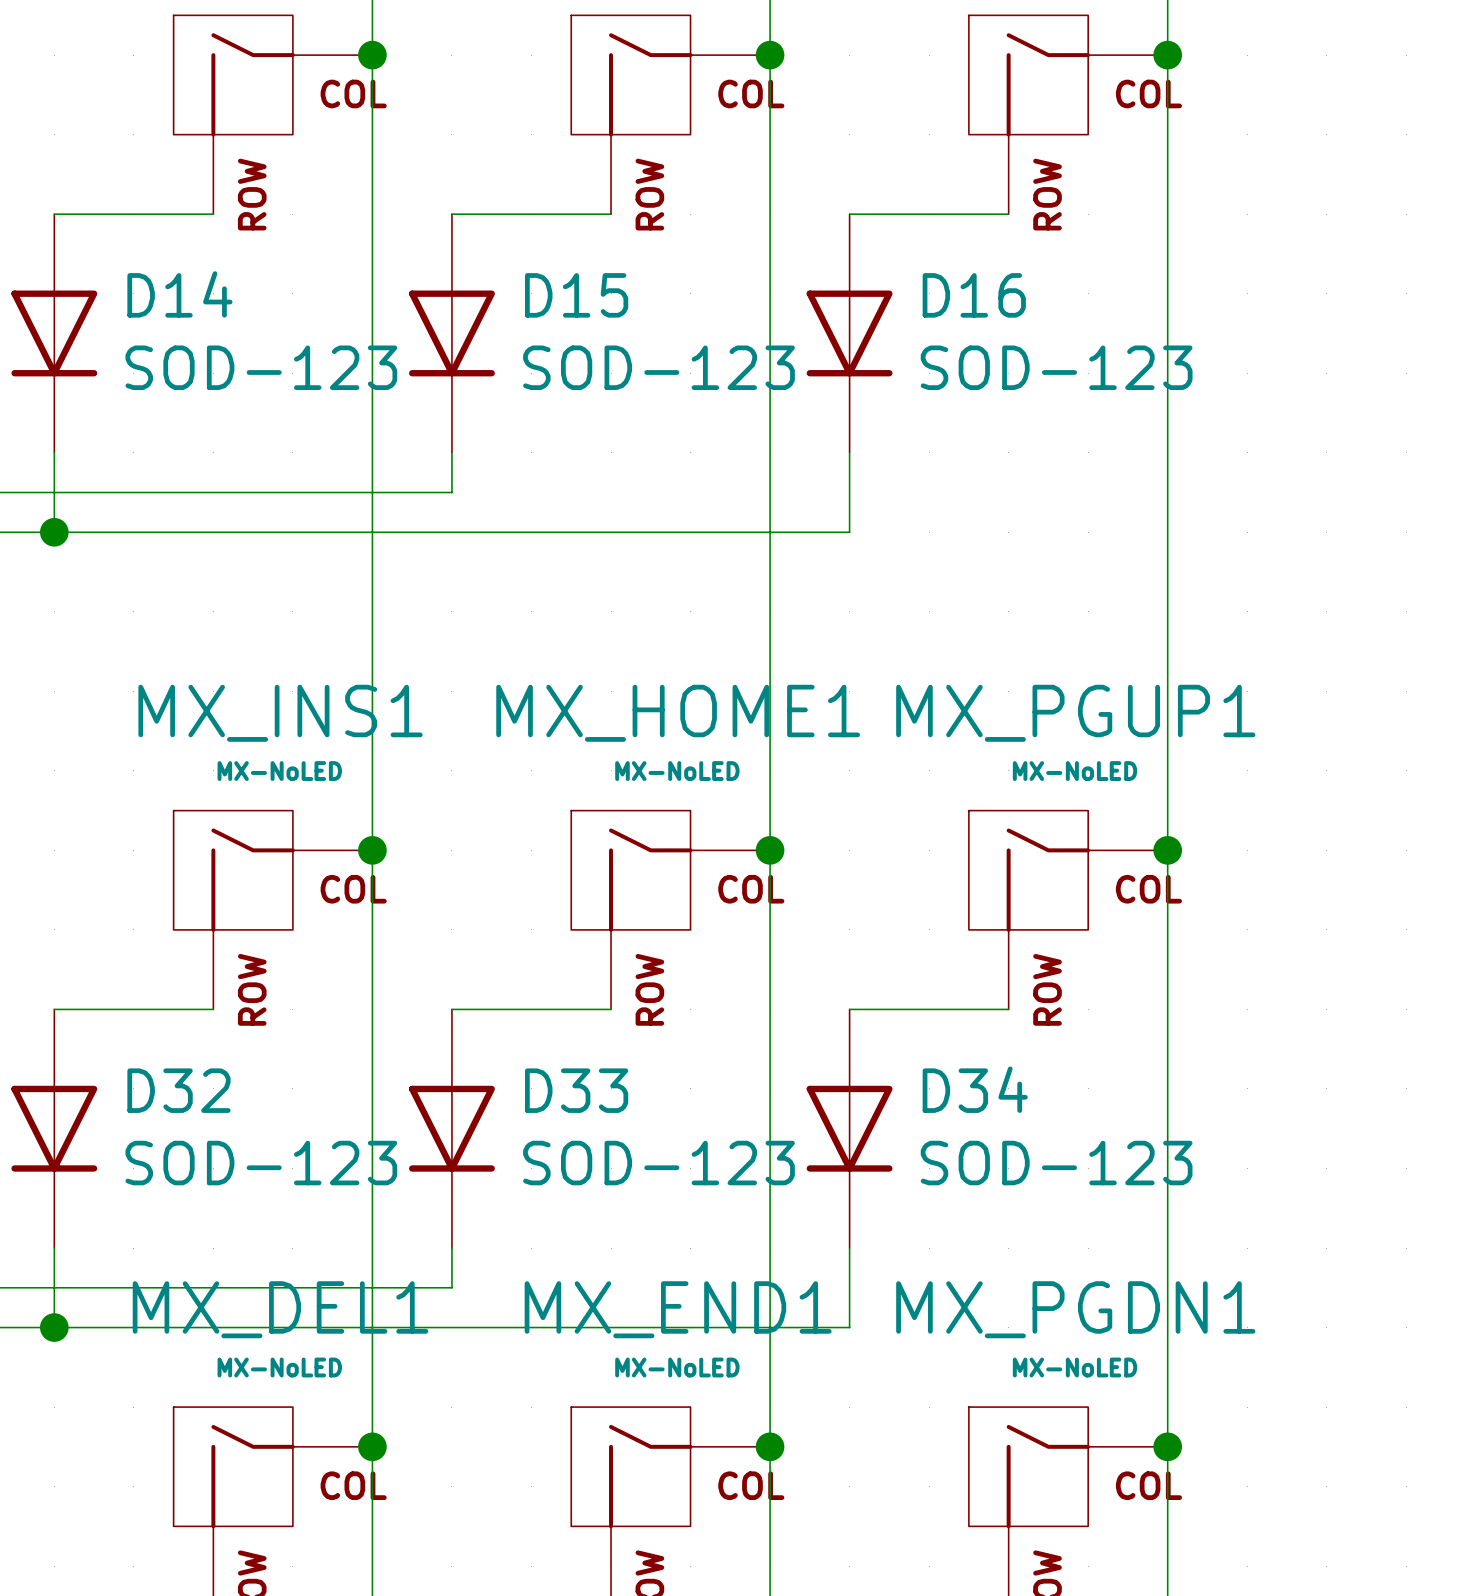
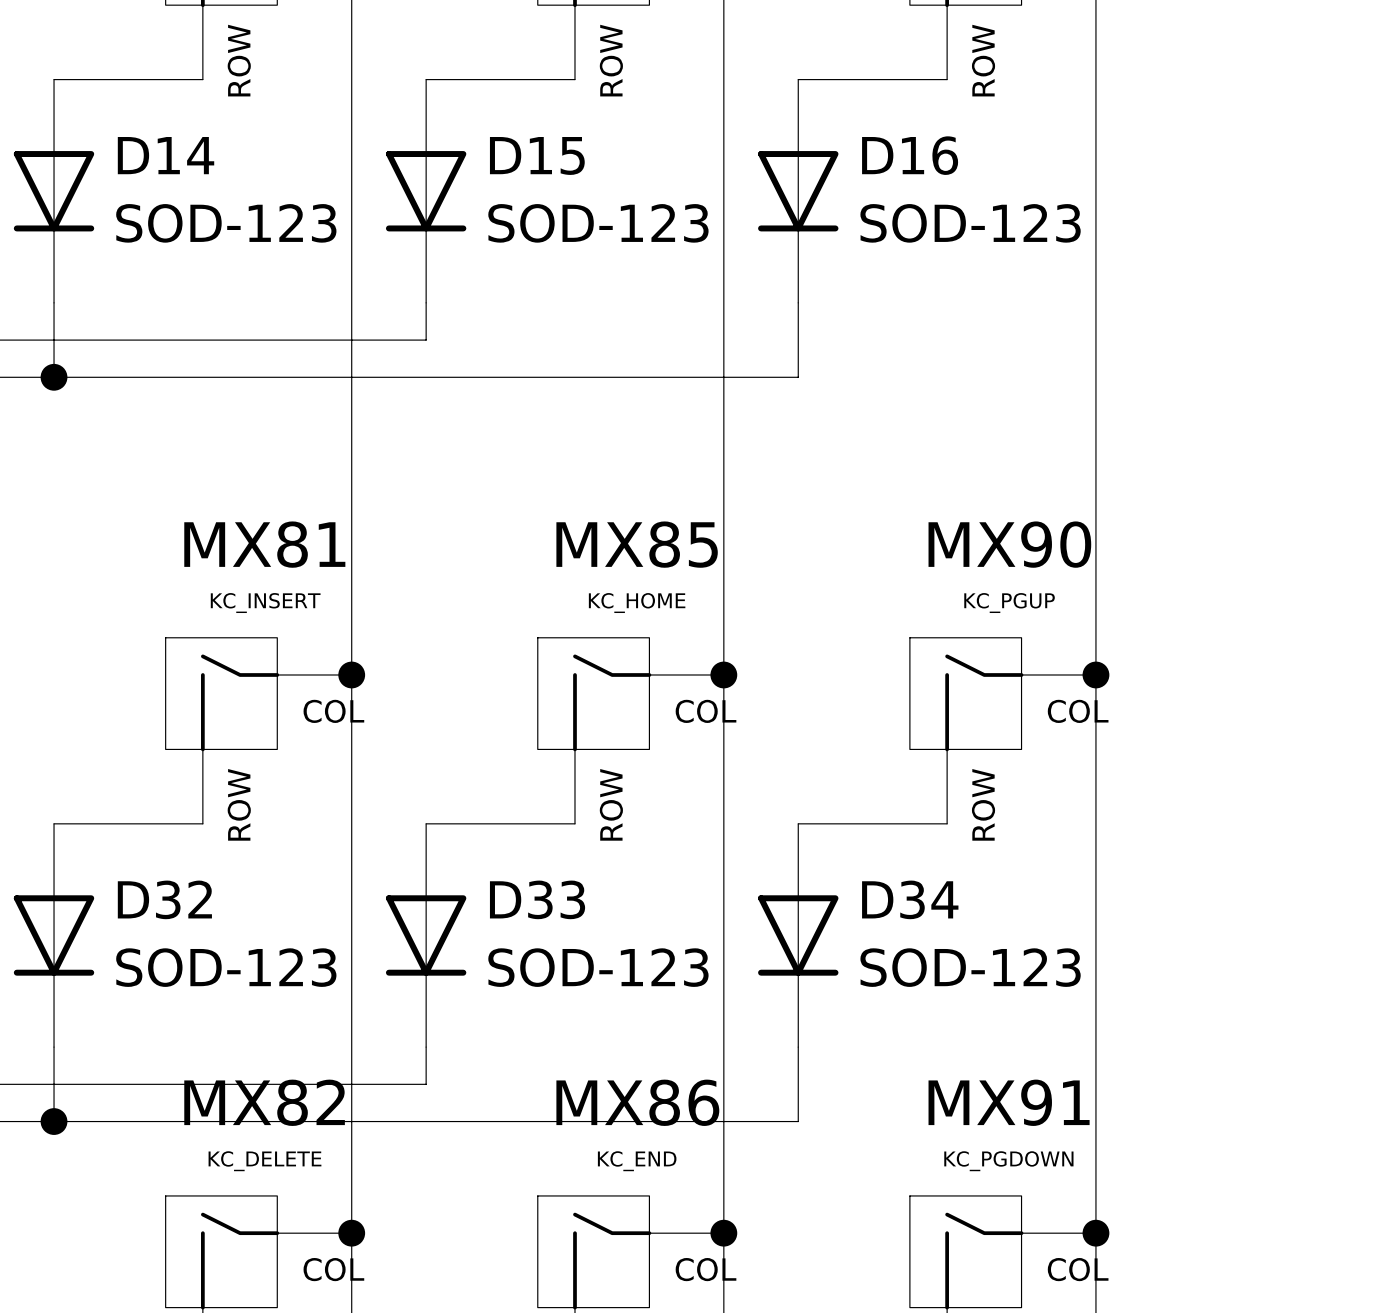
MX_INS1 name: MX_INS1 (280, 713) -> MX81 (264, 544)
MX_HOME1 name: MX_HOME1 (678, 713) -> MX85 (637, 544)
MX_PGUP1 name: MX_PGUP1 (1075, 713) -> MX90 (1009, 544)
MX_INS1 value: MX-NoLED (279, 771) -> KC_INSERT (265, 603)
MX_HOME1 value: MX-NoLED (677, 771) -> KC_HOME (637, 603)
MX_PGUP1 value: MX-NoLED (1075, 771) -> KC_PGUP (1009, 603)
MX_DEL1 name: MX_DEL1 (280, 1309) -> MX82 (264, 1102)
MX_END1 name: MX_END1 (678, 1309) -> MX86 (637, 1102)
MX_PGDN1 name: MX_PGDN1 (1075, 1309) -> MX91 (1009, 1102)
MX_DEL1 value: MX-NoLED (279, 1367) -> KC_DELETE (264, 1161)
MX_END1 value: MX-NoLED (677, 1367) -> KC_END (637, 1161)
MX_PGDN1 value: MX-NoLED (1075, 1367) -> KC_PGDOWN (1008, 1161)

